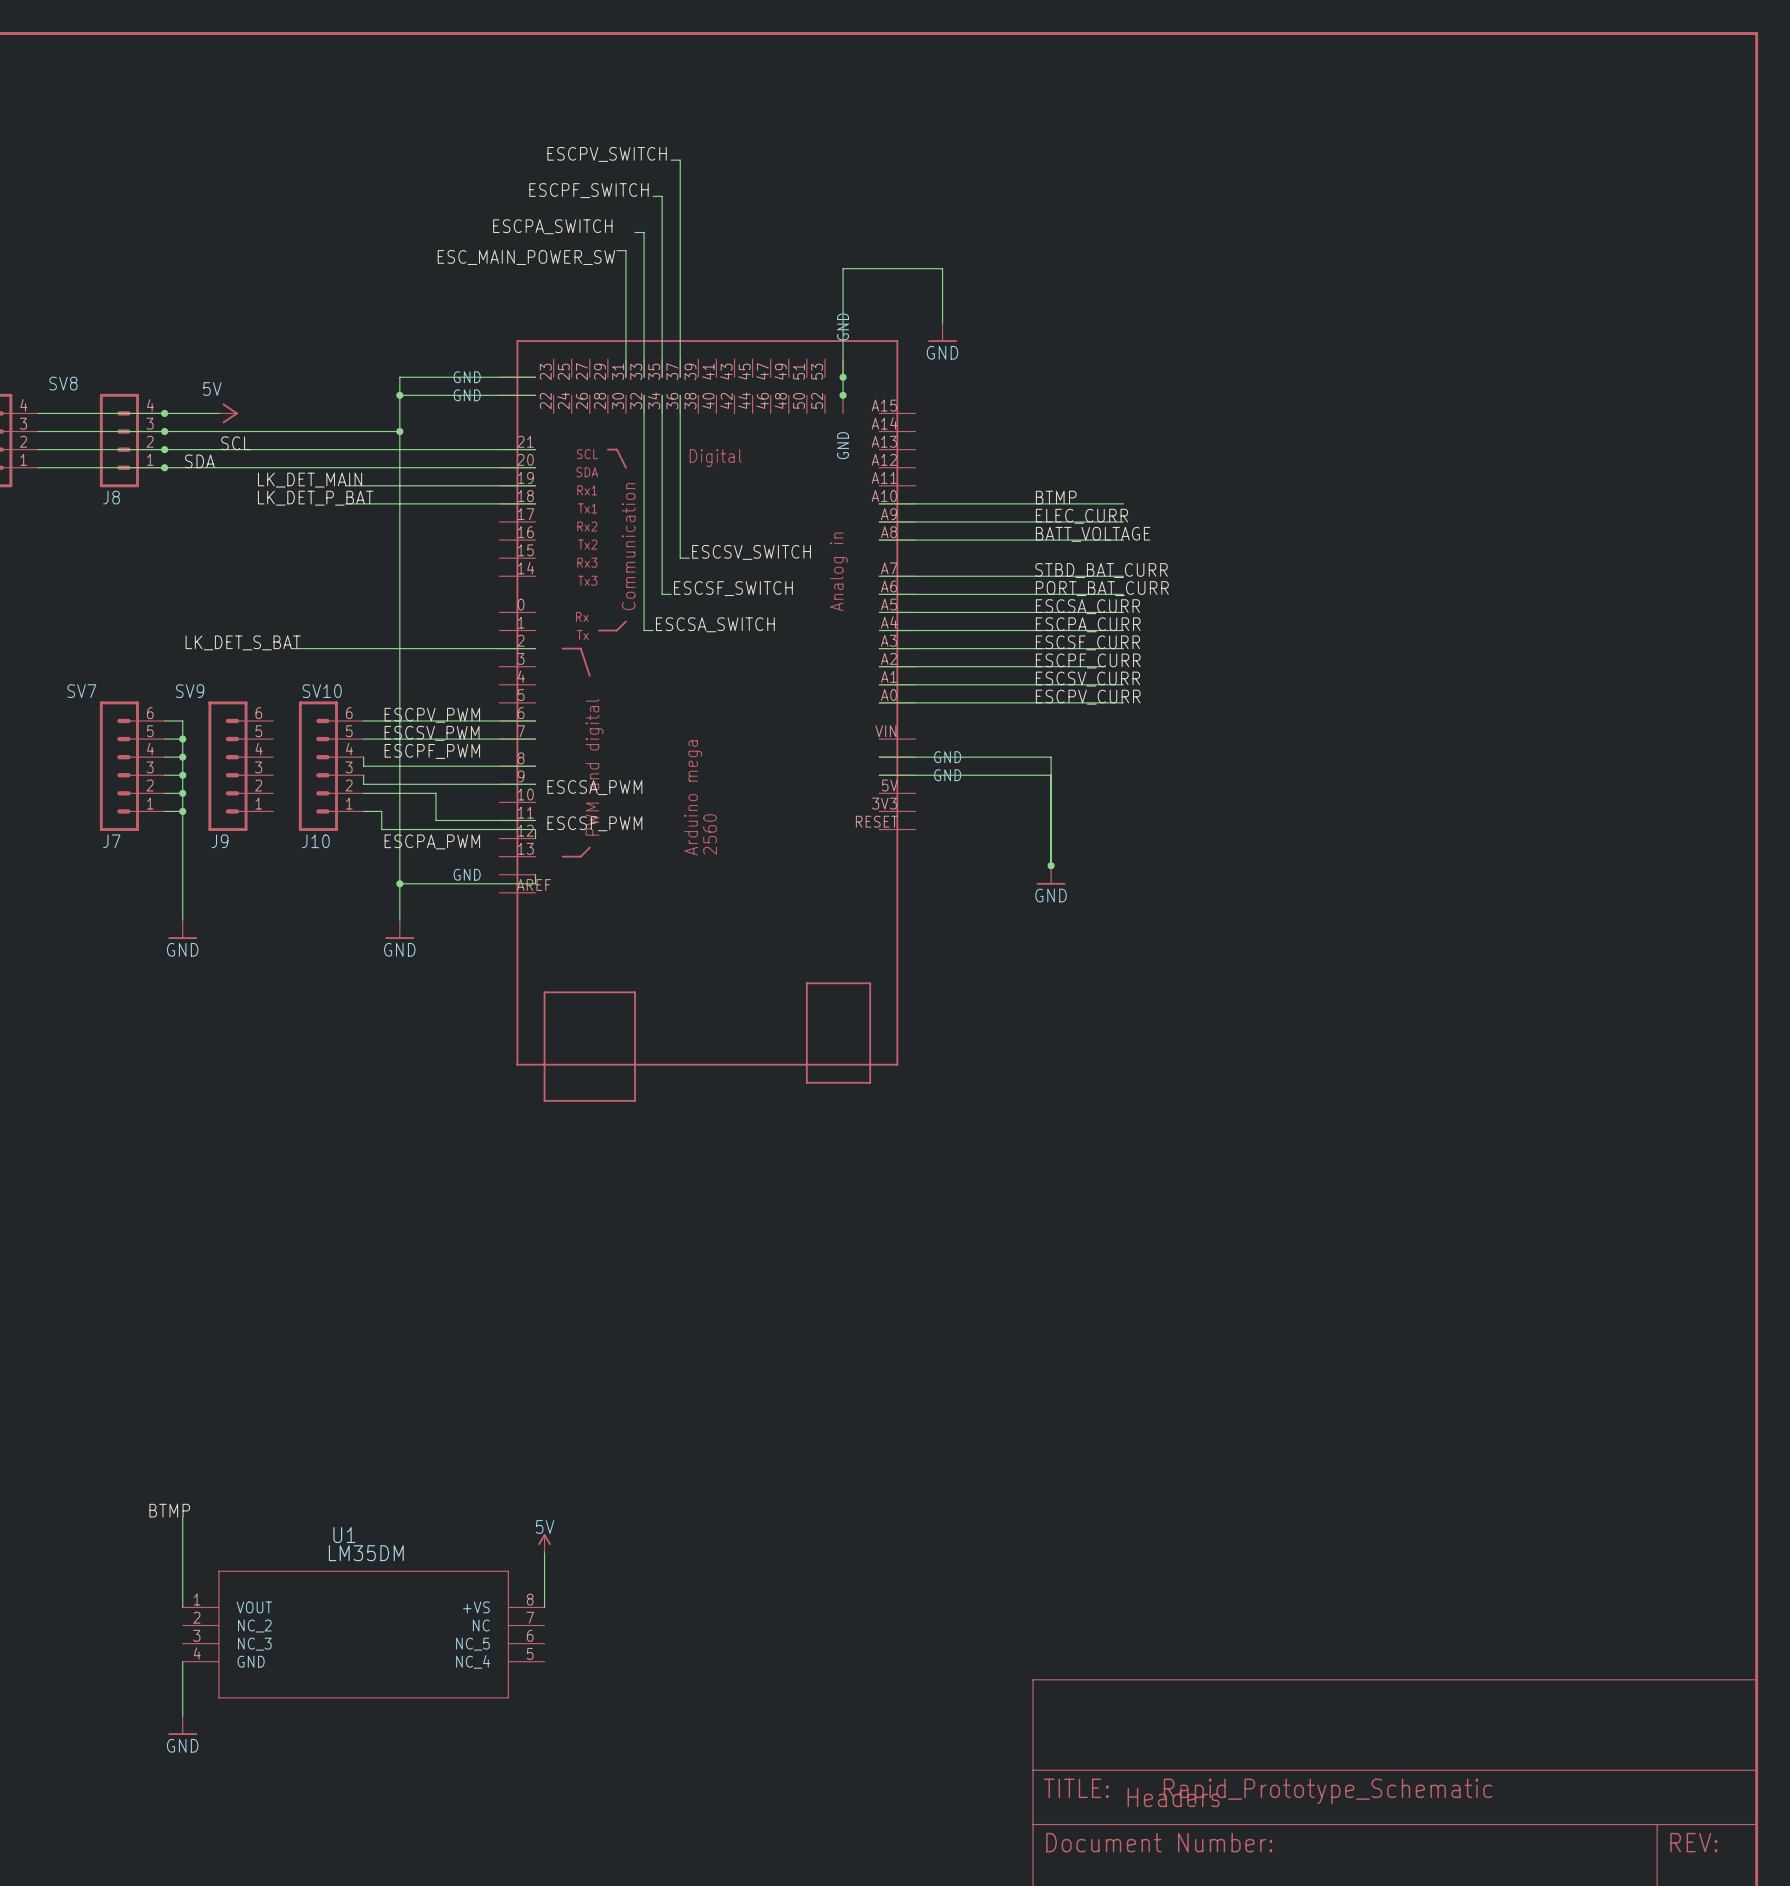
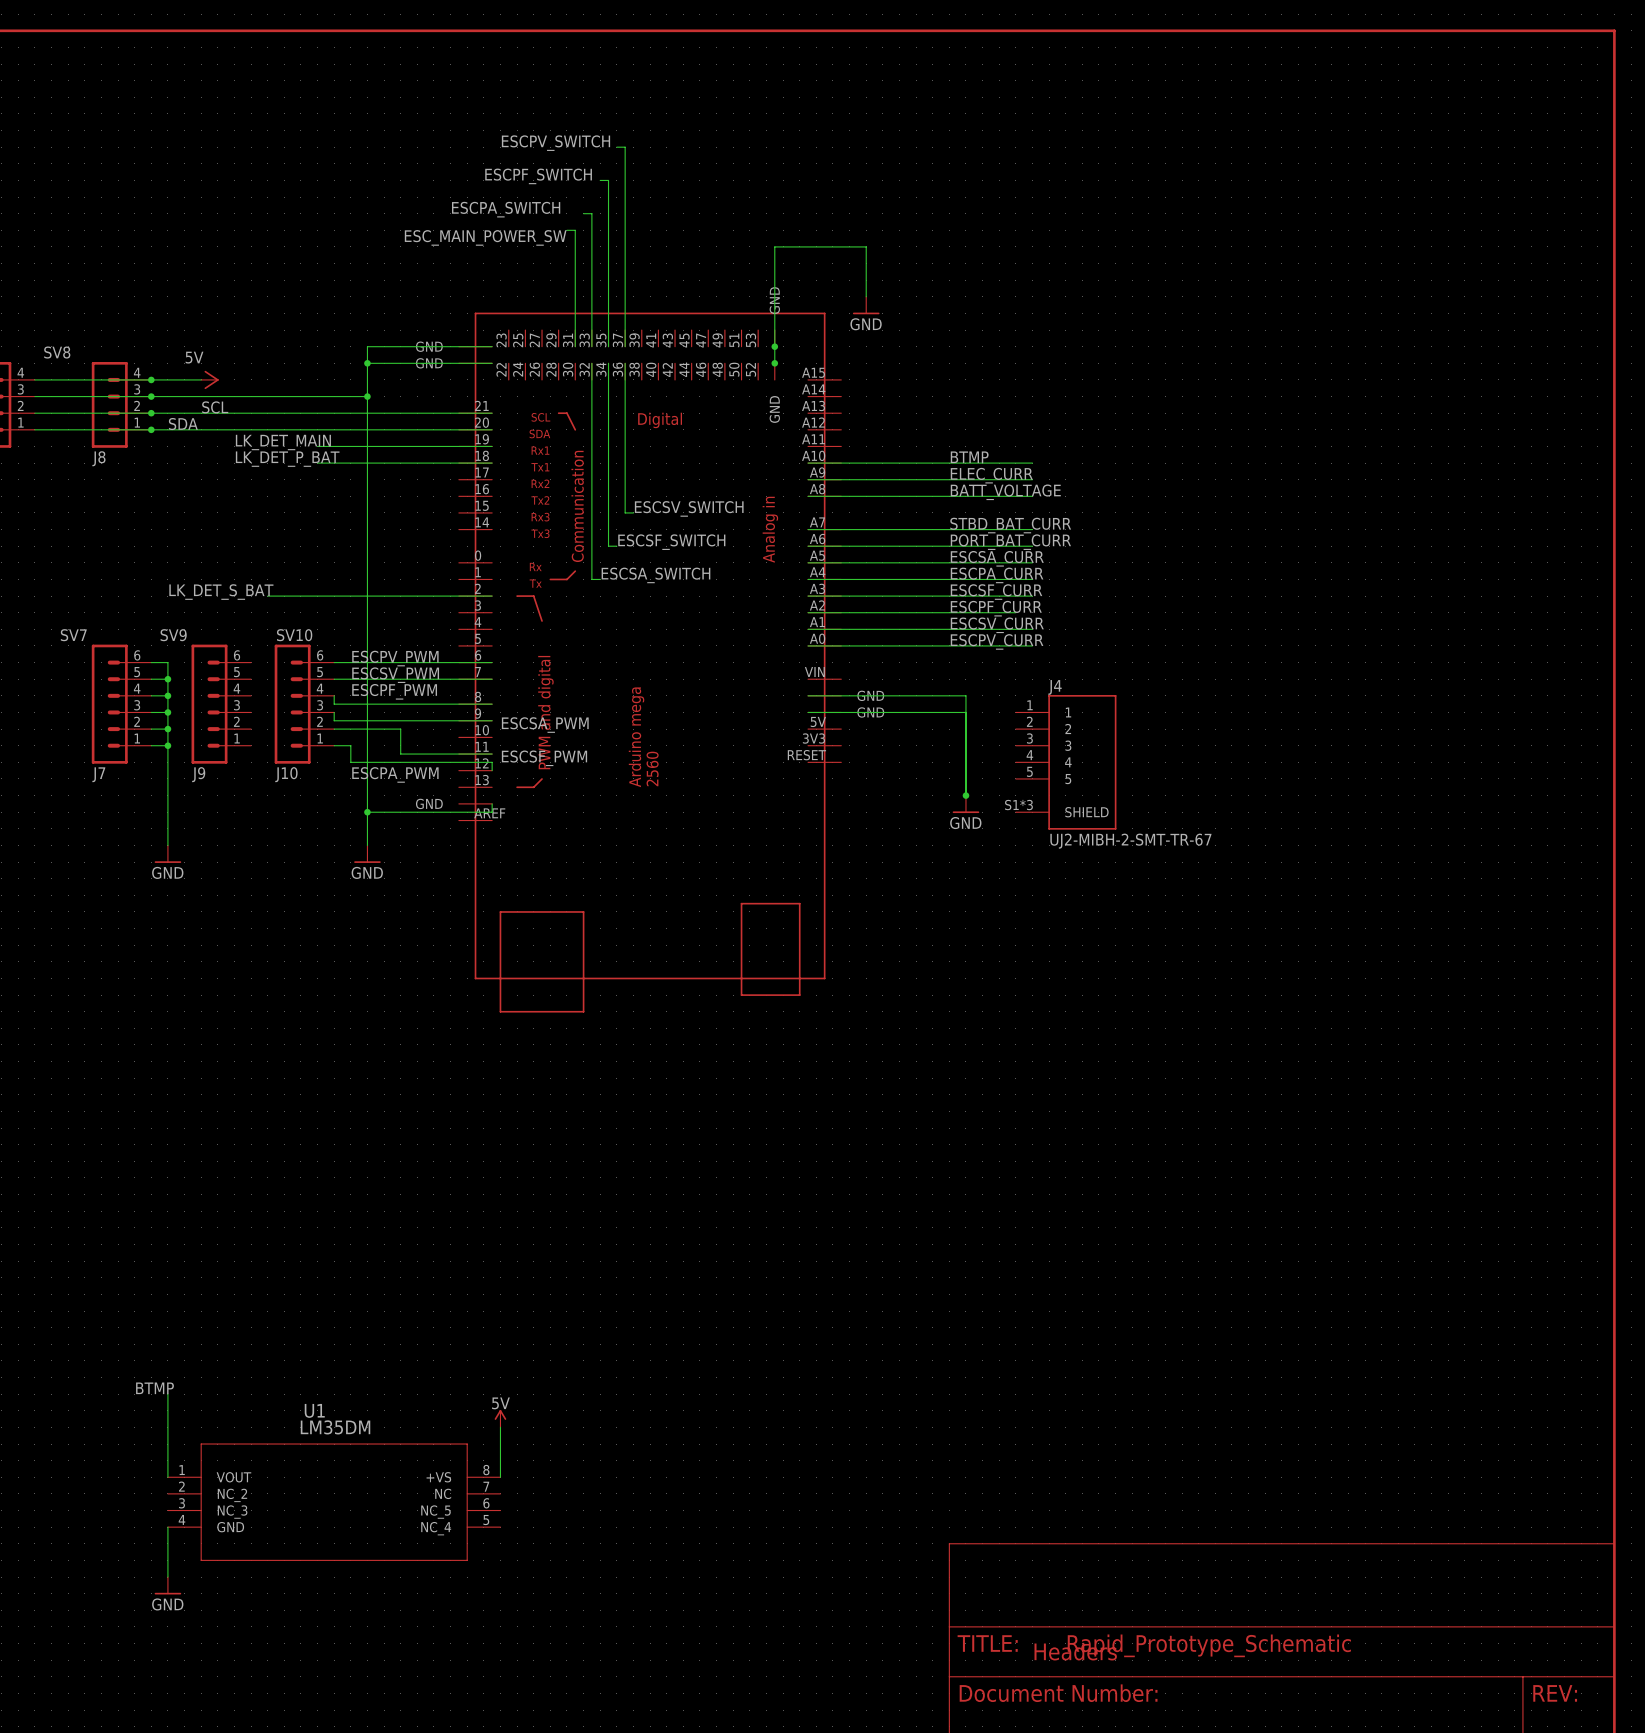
J4: none -> UJ2-MIBH-2-SMT-TR-67 (1066, 762)

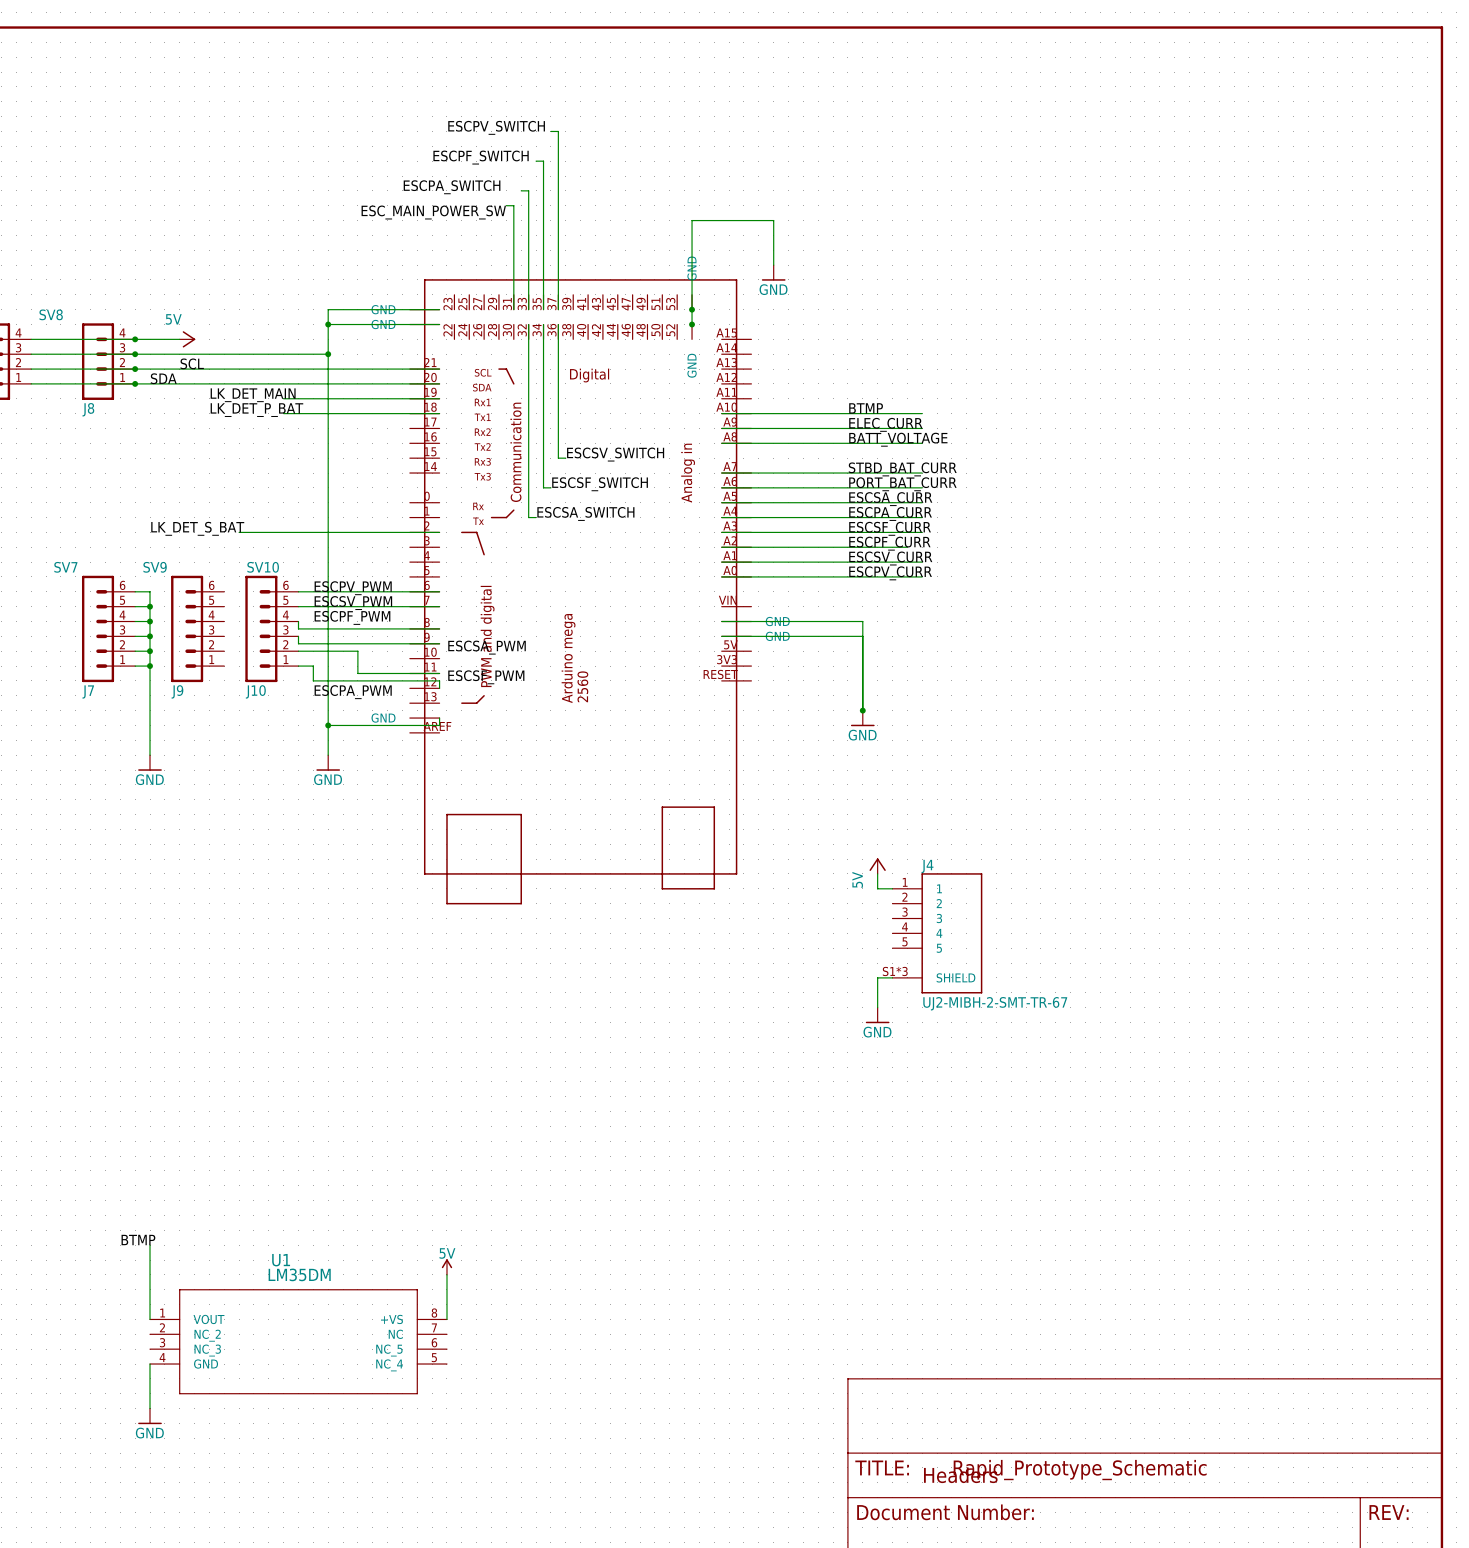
J4 position: (1066, 762) -> (937, 933)
power symbol: none -> 5V (877, 866)
wire: none -> (877, 873) (877, 888) (892, 888)
wire: none -> (892, 977) (877, 977) (877, 1007)
power symbol: none -> GND (877, 1015)

